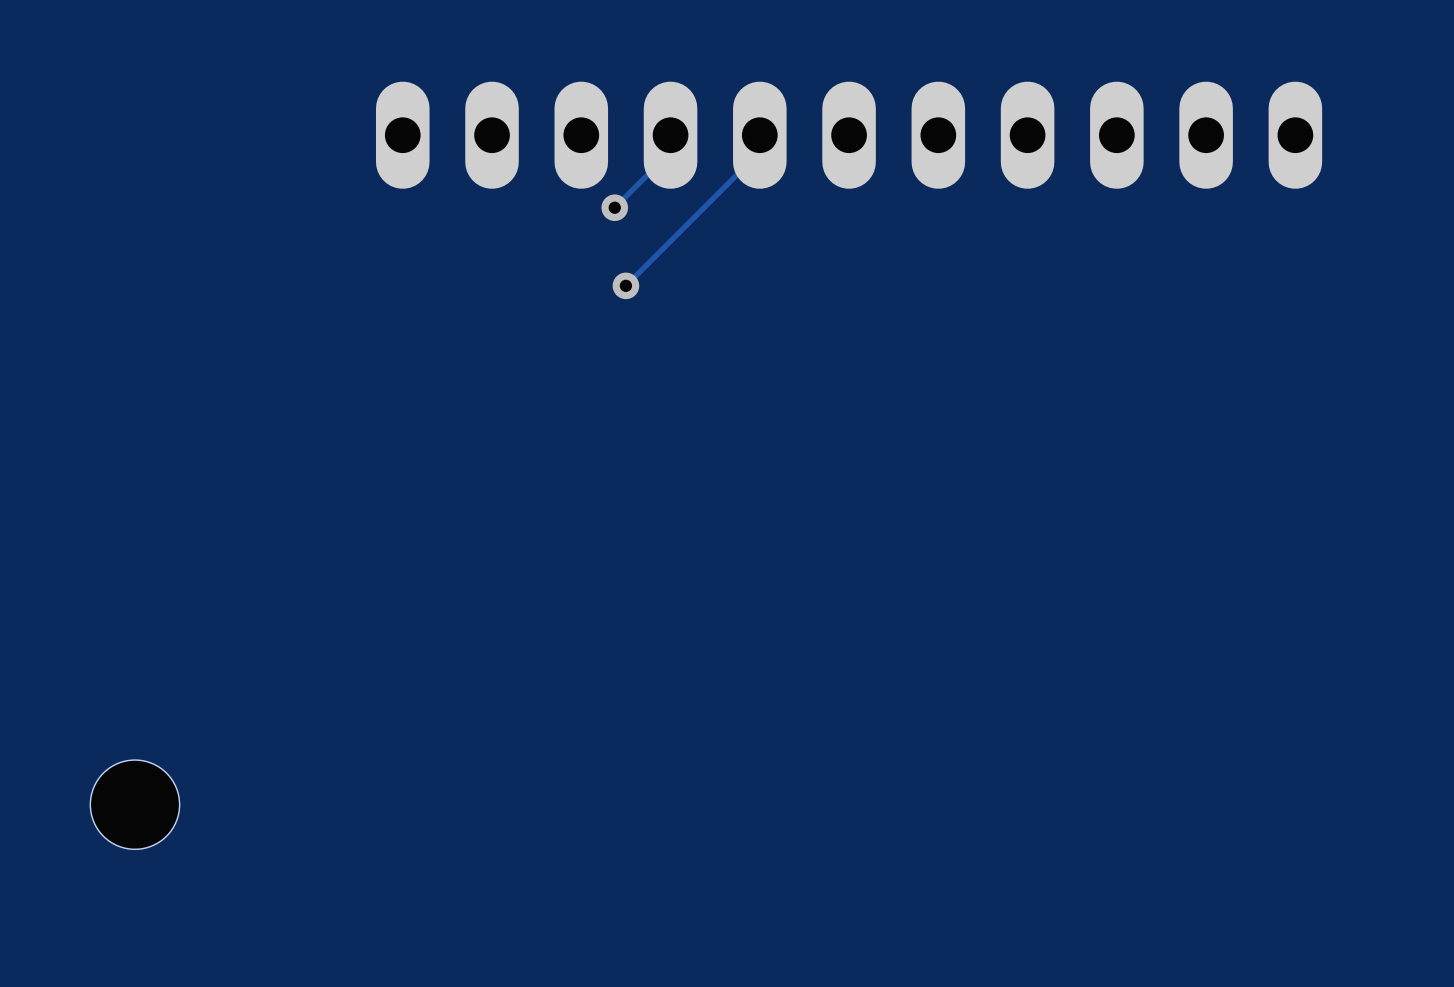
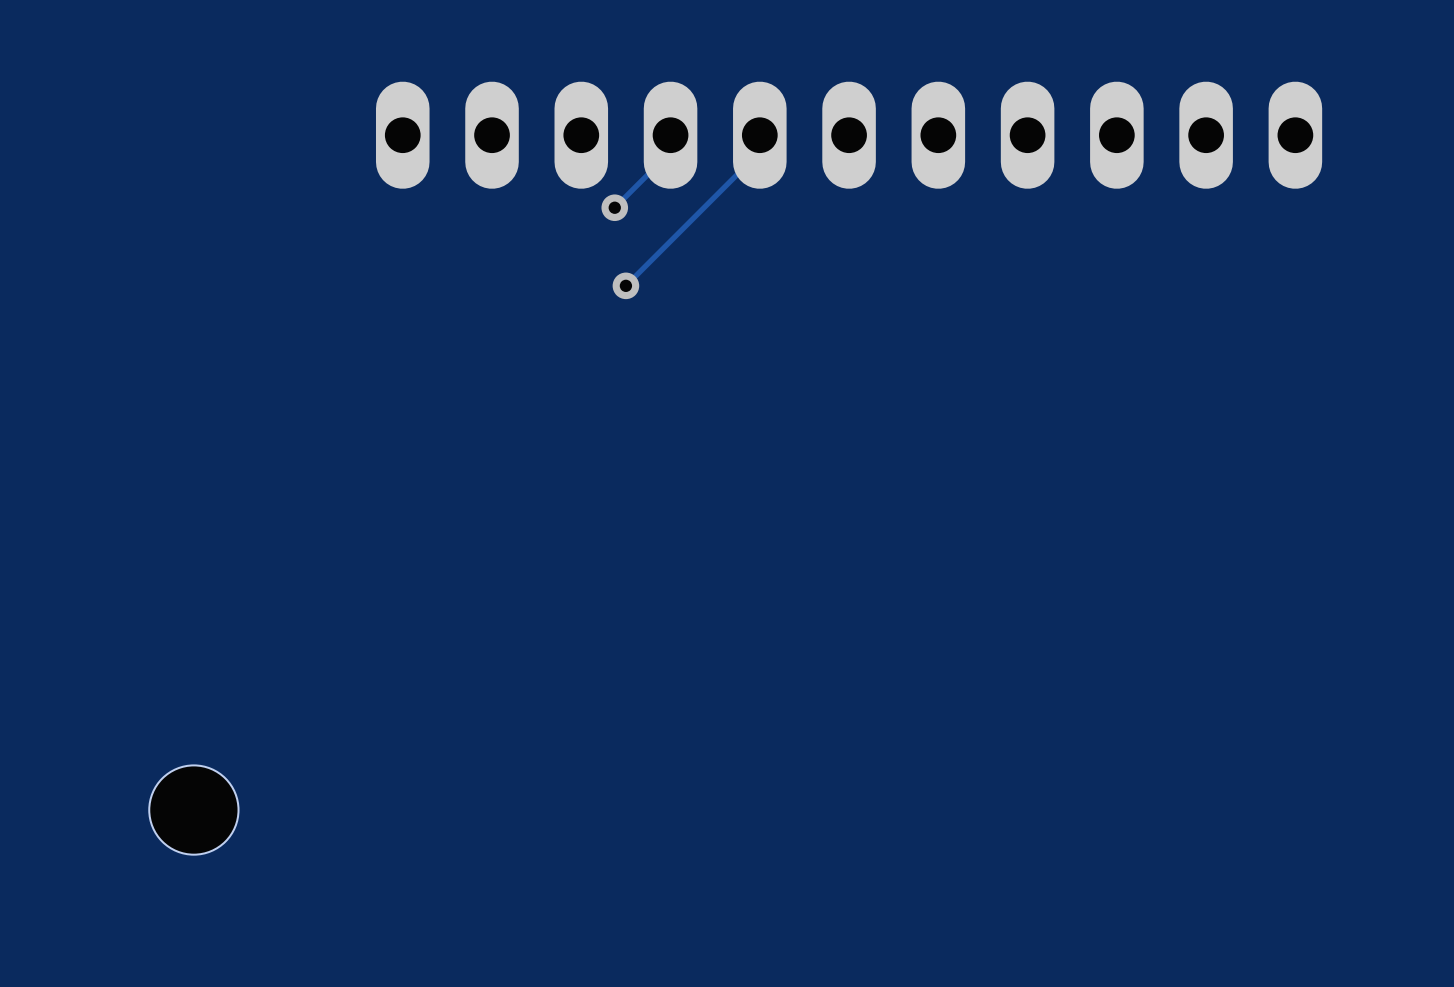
hole position: (134, 804) -> (193, 810)

